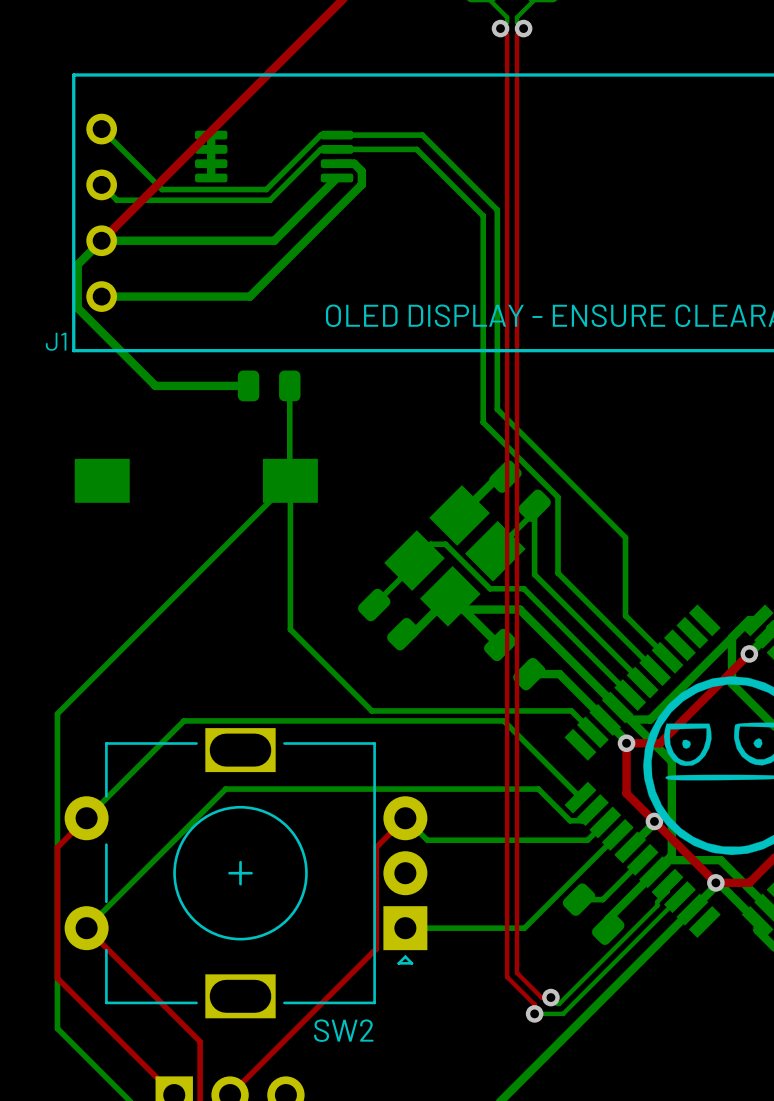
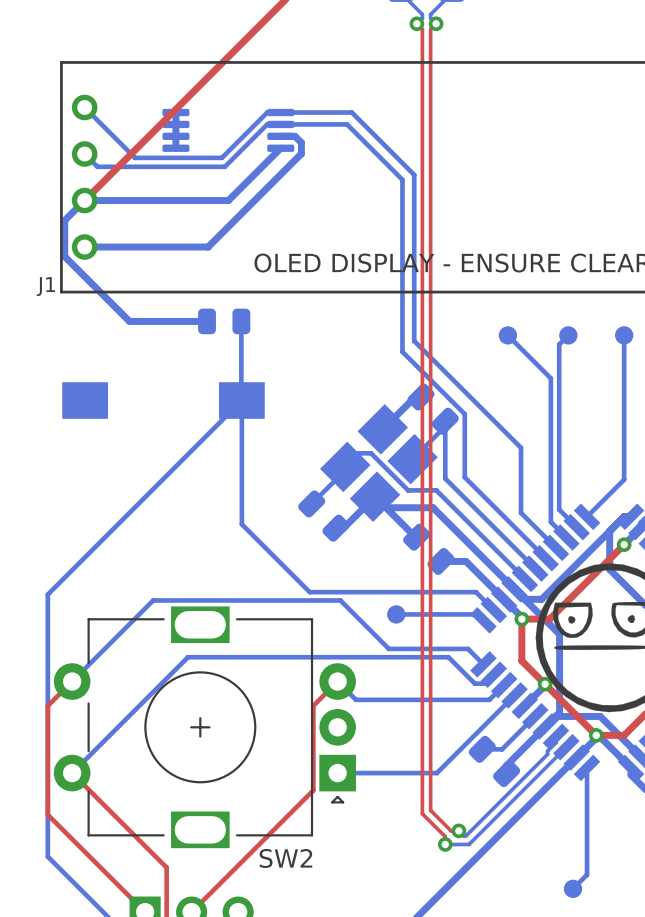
bottom track: none -> (507, 335) (550, 378) (550, 522) (566, 537)
part: none -> (507, 335)
bottom track: none -> (568, 335) (559, 344) (559, 509) (576, 527)
part: none -> (568, 335)
bottom track: none -> (624, 335) (624, 479) (587, 516)
part: none -> (624, 335)
bottom track: (408, 720) (503, 720) (561, 779) -> (340, 600) (388, 648) (468, 648)
bottom track: none -> (396, 614) (477, 614) (483, 620)
part: none -> (396, 614)
bottom track: none -> (587, 767) (587, 874) (573, 888)
part: none -> (573, 888)

